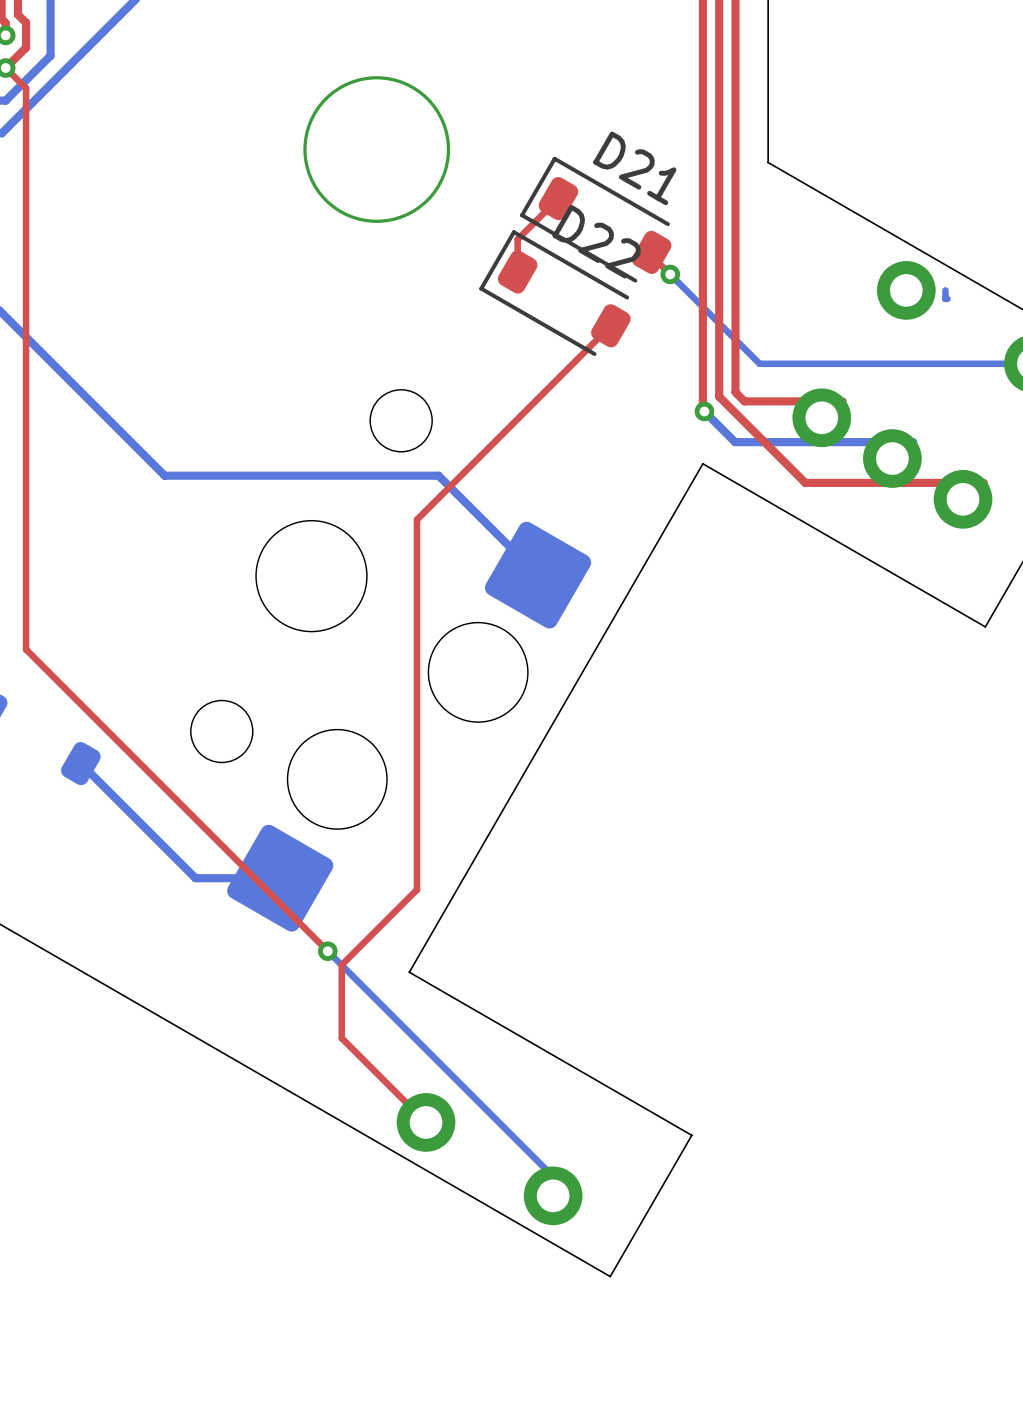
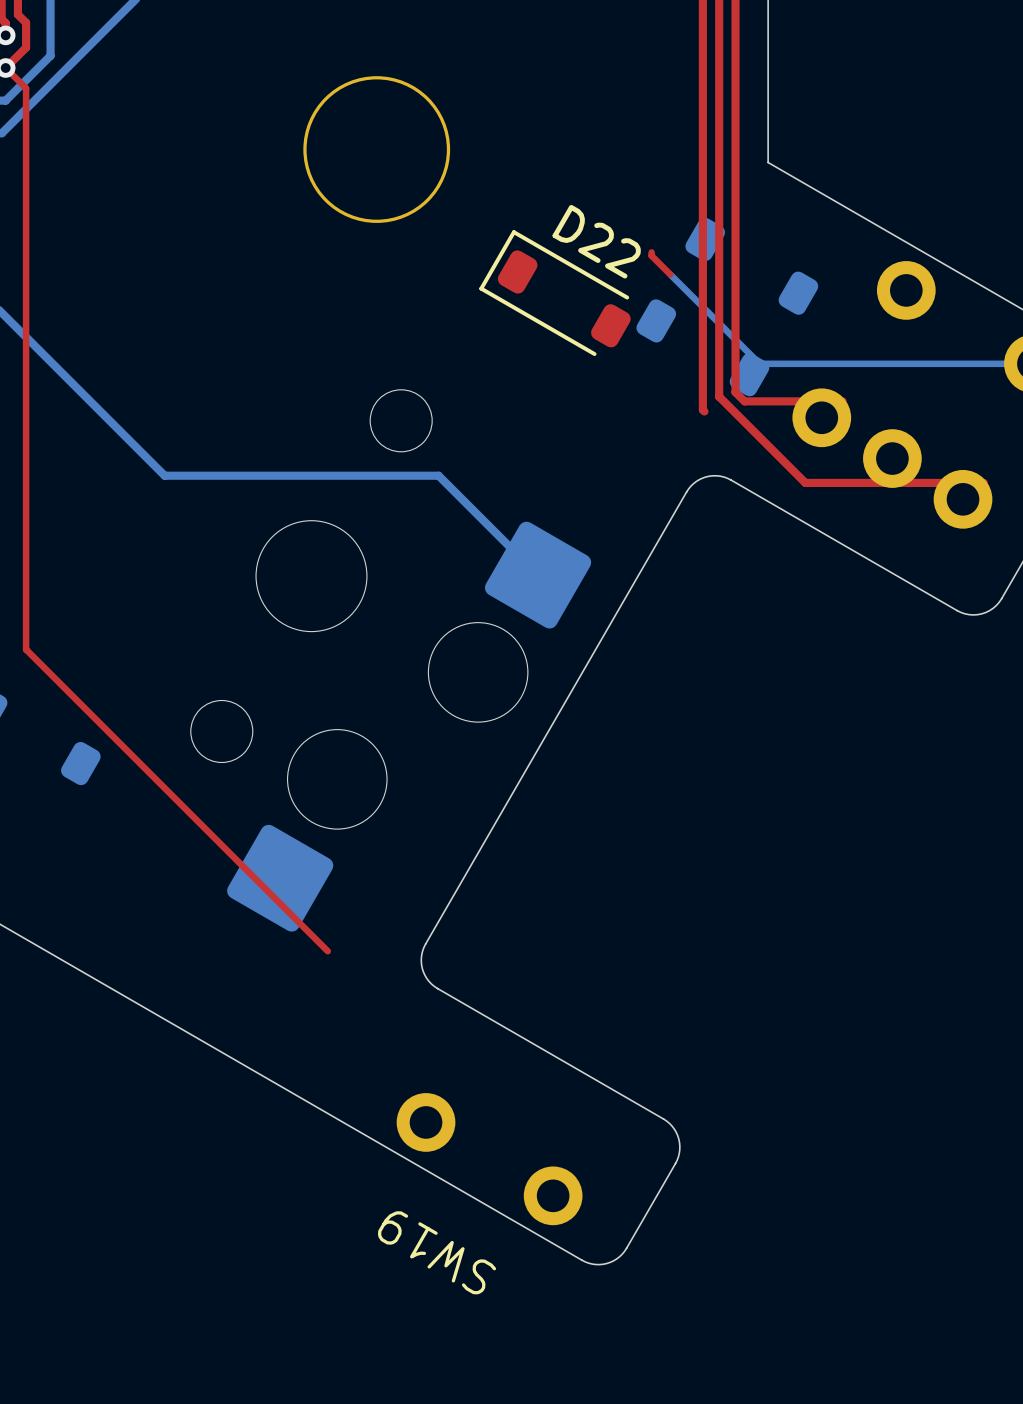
top track: (558, 198) (517, 239) (517, 271) -> none
D21: (595, 219) -> none
part: none -> (751, 266)
via: (670, 274) -> none
bottom track: (945, 290) (945, 298) (947, 298) -> none
top track: (610, 325) (416, 519) (416, 889) (341, 964) (341, 1038) (426, 1122) -> none
part: none -> (702, 347)
bottom track: (704, 411) (735, 442) (913, 442) -> none
via: (704, 411) -> none
board edge: (731, 480) (702, 463) (686, 492) -> (731, 480) (720, 476) (706, 476) (696, 481) (686, 492)
board edge: (1001, 598) (985, 626) (957, 610) -> (1001, 598) (993, 608) (981, 613) (969, 614) (957, 610)
bottom track: (80, 763) (195, 878) (280, 878) -> none
board edge: (425, 944) (409, 972) (437, 988) -> (425, 944) (421, 957) (422, 968) (429, 981) (437, 988)
bottom track: (327, 951) (553, 1176) (553, 1195) -> none
via: (327, 951) -> none
board edge: (663, 1119) (691, 1135) (675, 1163) -> (663, 1119) (671, 1125) (678, 1138) (679, 1153) (675, 1163)
board edge: (626, 1248) (610, 1276) (582, 1260) -> (626, 1248) (616, 1258) (606, 1263) (592, 1264) (582, 1260)
SW19 name: none -> SW19 (437, 1252)

